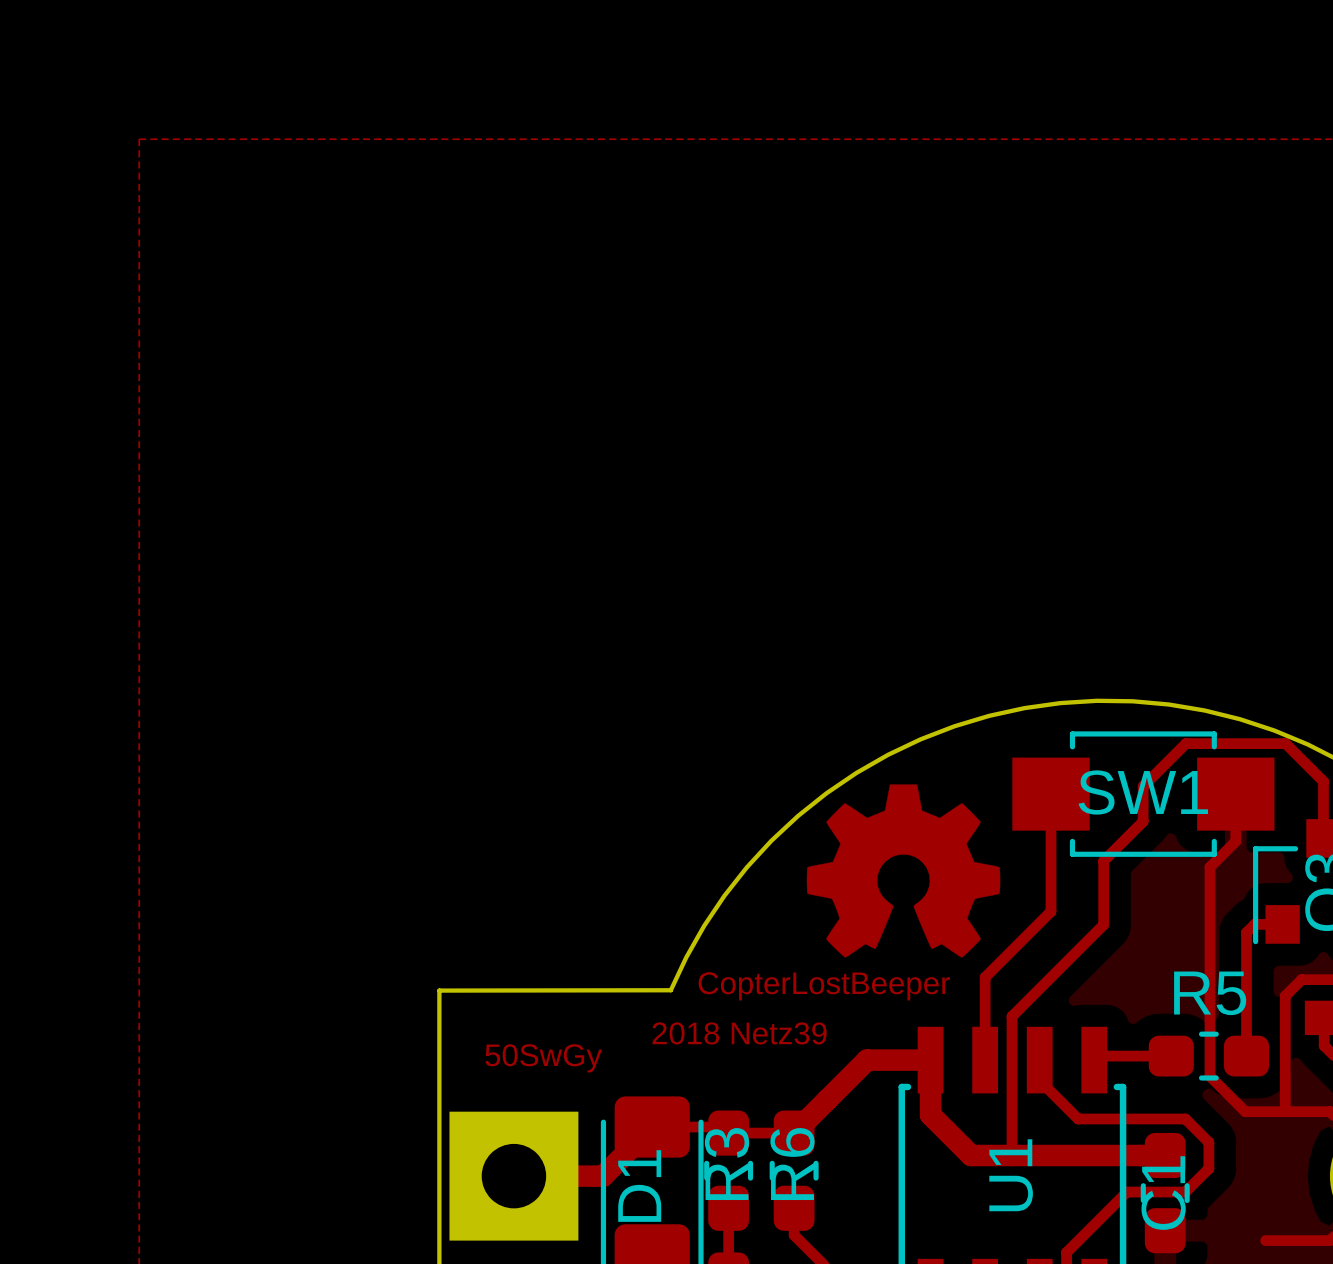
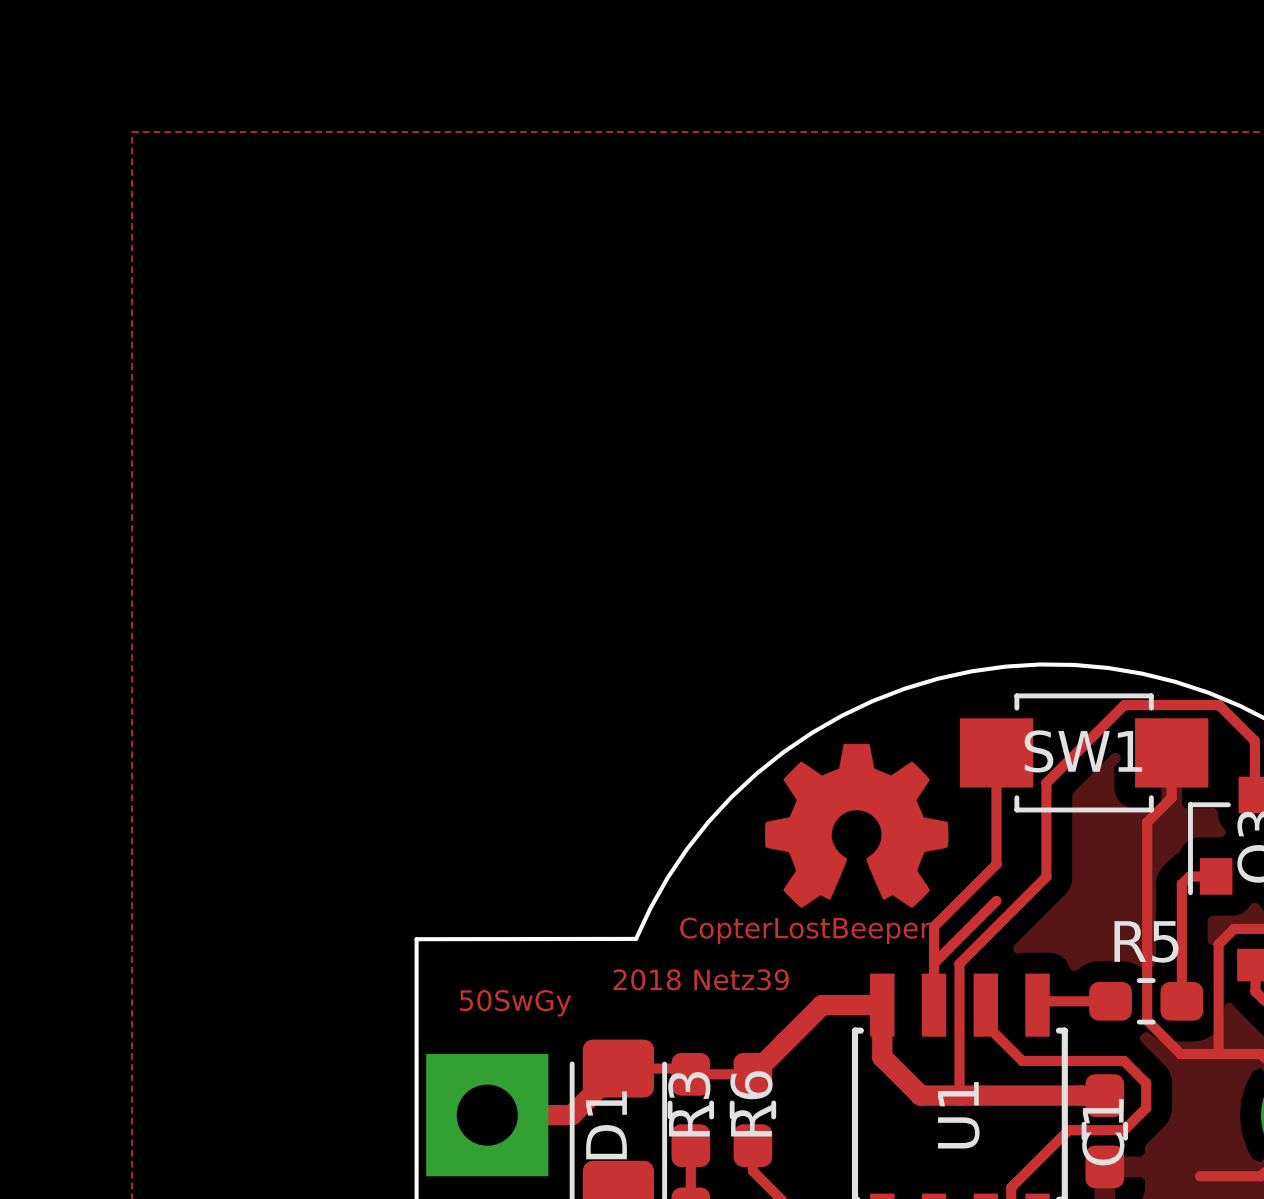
top track: (1143, 786) (1143, 821) (1103, 861) -> (1083, 745) (1046, 783) (1046, 816)
top track: none -> (996, 900) (934, 963)
text position: CopterLostBeeper (824, 986) -> CopterLostBeeper (805, 930)

